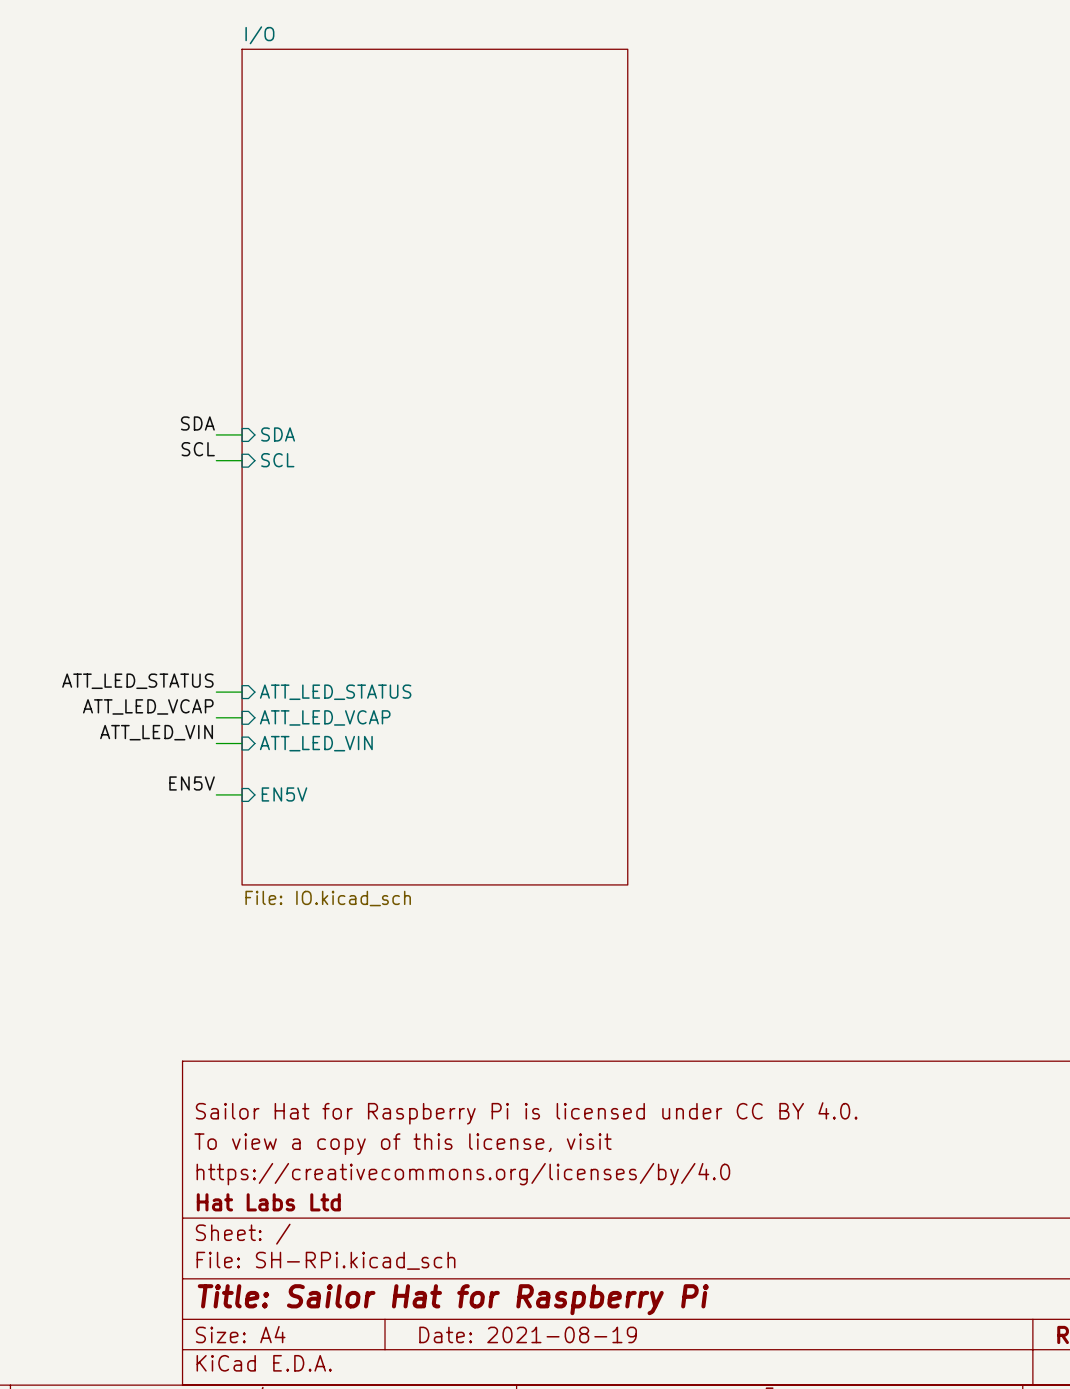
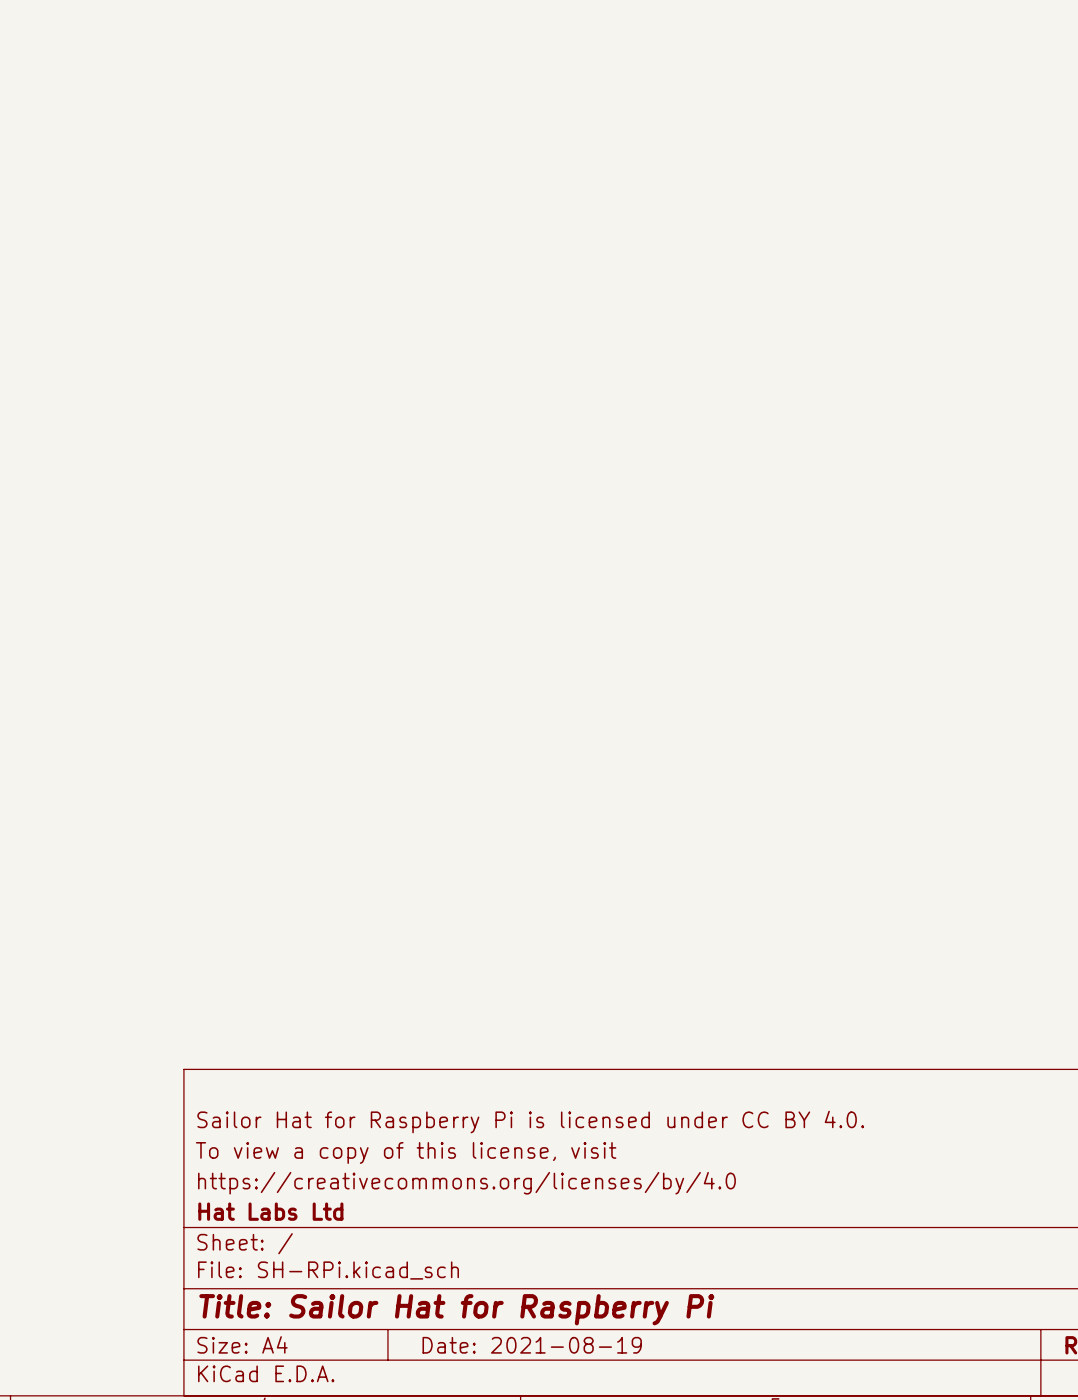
label: SDA (197, 423) -> none
wire: (216, 434) (242, 434) -> none
sheet pin: SDA (278, 434) -> none
label: SCL (198, 449) -> none
wire: (216, 460) (242, 460) -> none
sheet pin: SCL (277, 460) -> none
sheet I/O: File: IO.kicad_sch (434, 467) -> none
label: ATT_LED_STATUS (137, 681) -> none
wire: (216, 692) (242, 692) -> none
sheet pin: ATT_LED_STATUS (335, 692) -> none
label: ATT_LED_VCAP (148, 706) -> none
wire: (216, 717) (242, 717) -> none
sheet pin: ATT_LED_VCAP (325, 717) -> none
label: ATT_LED_VIN (156, 732) -> none
wire: (216, 743) (242, 743) -> none
sheet pin: ATT_LED_VIN (316, 743) -> none
label: EN5V (192, 783) -> none
wire: (216, 794) (242, 794) -> none
sheet pin: EN5V (284, 794) -> none

